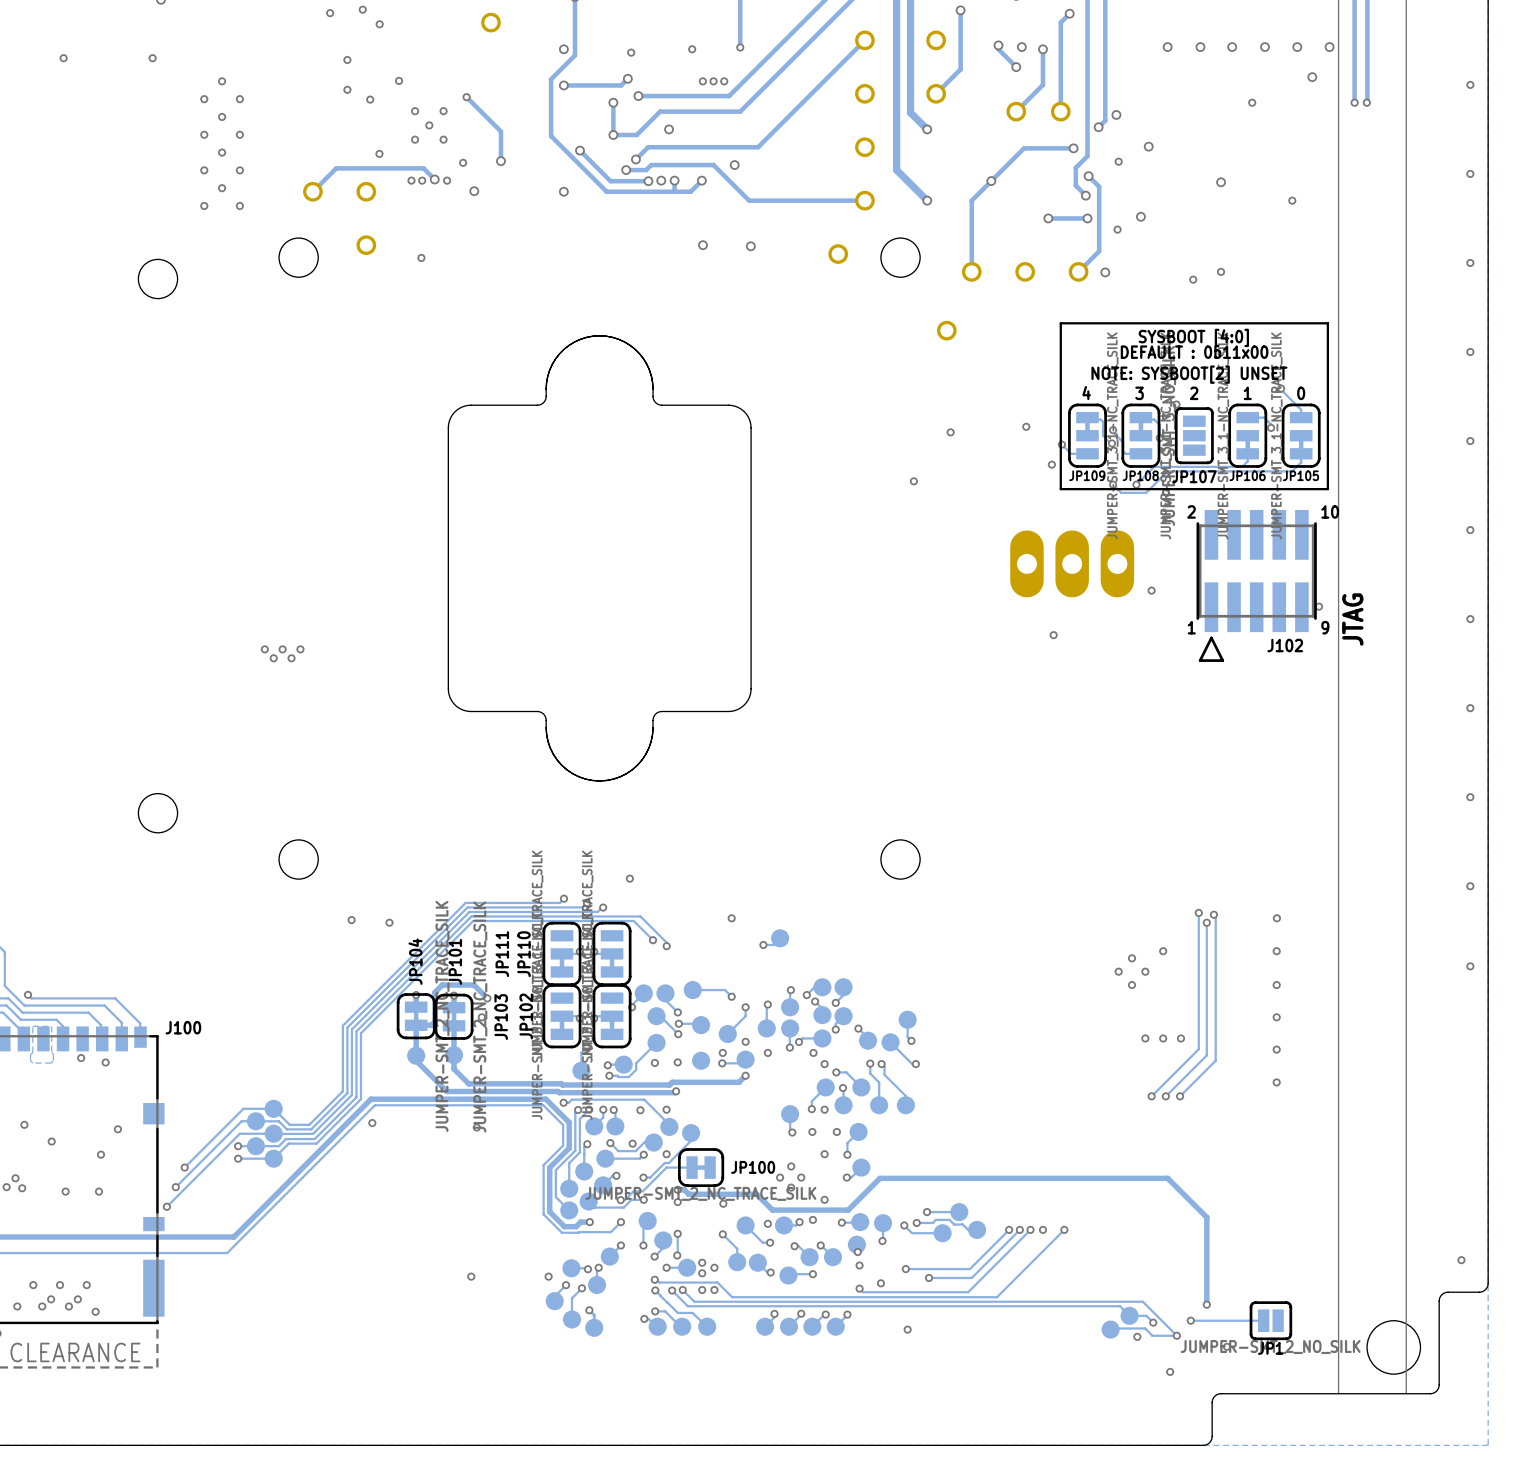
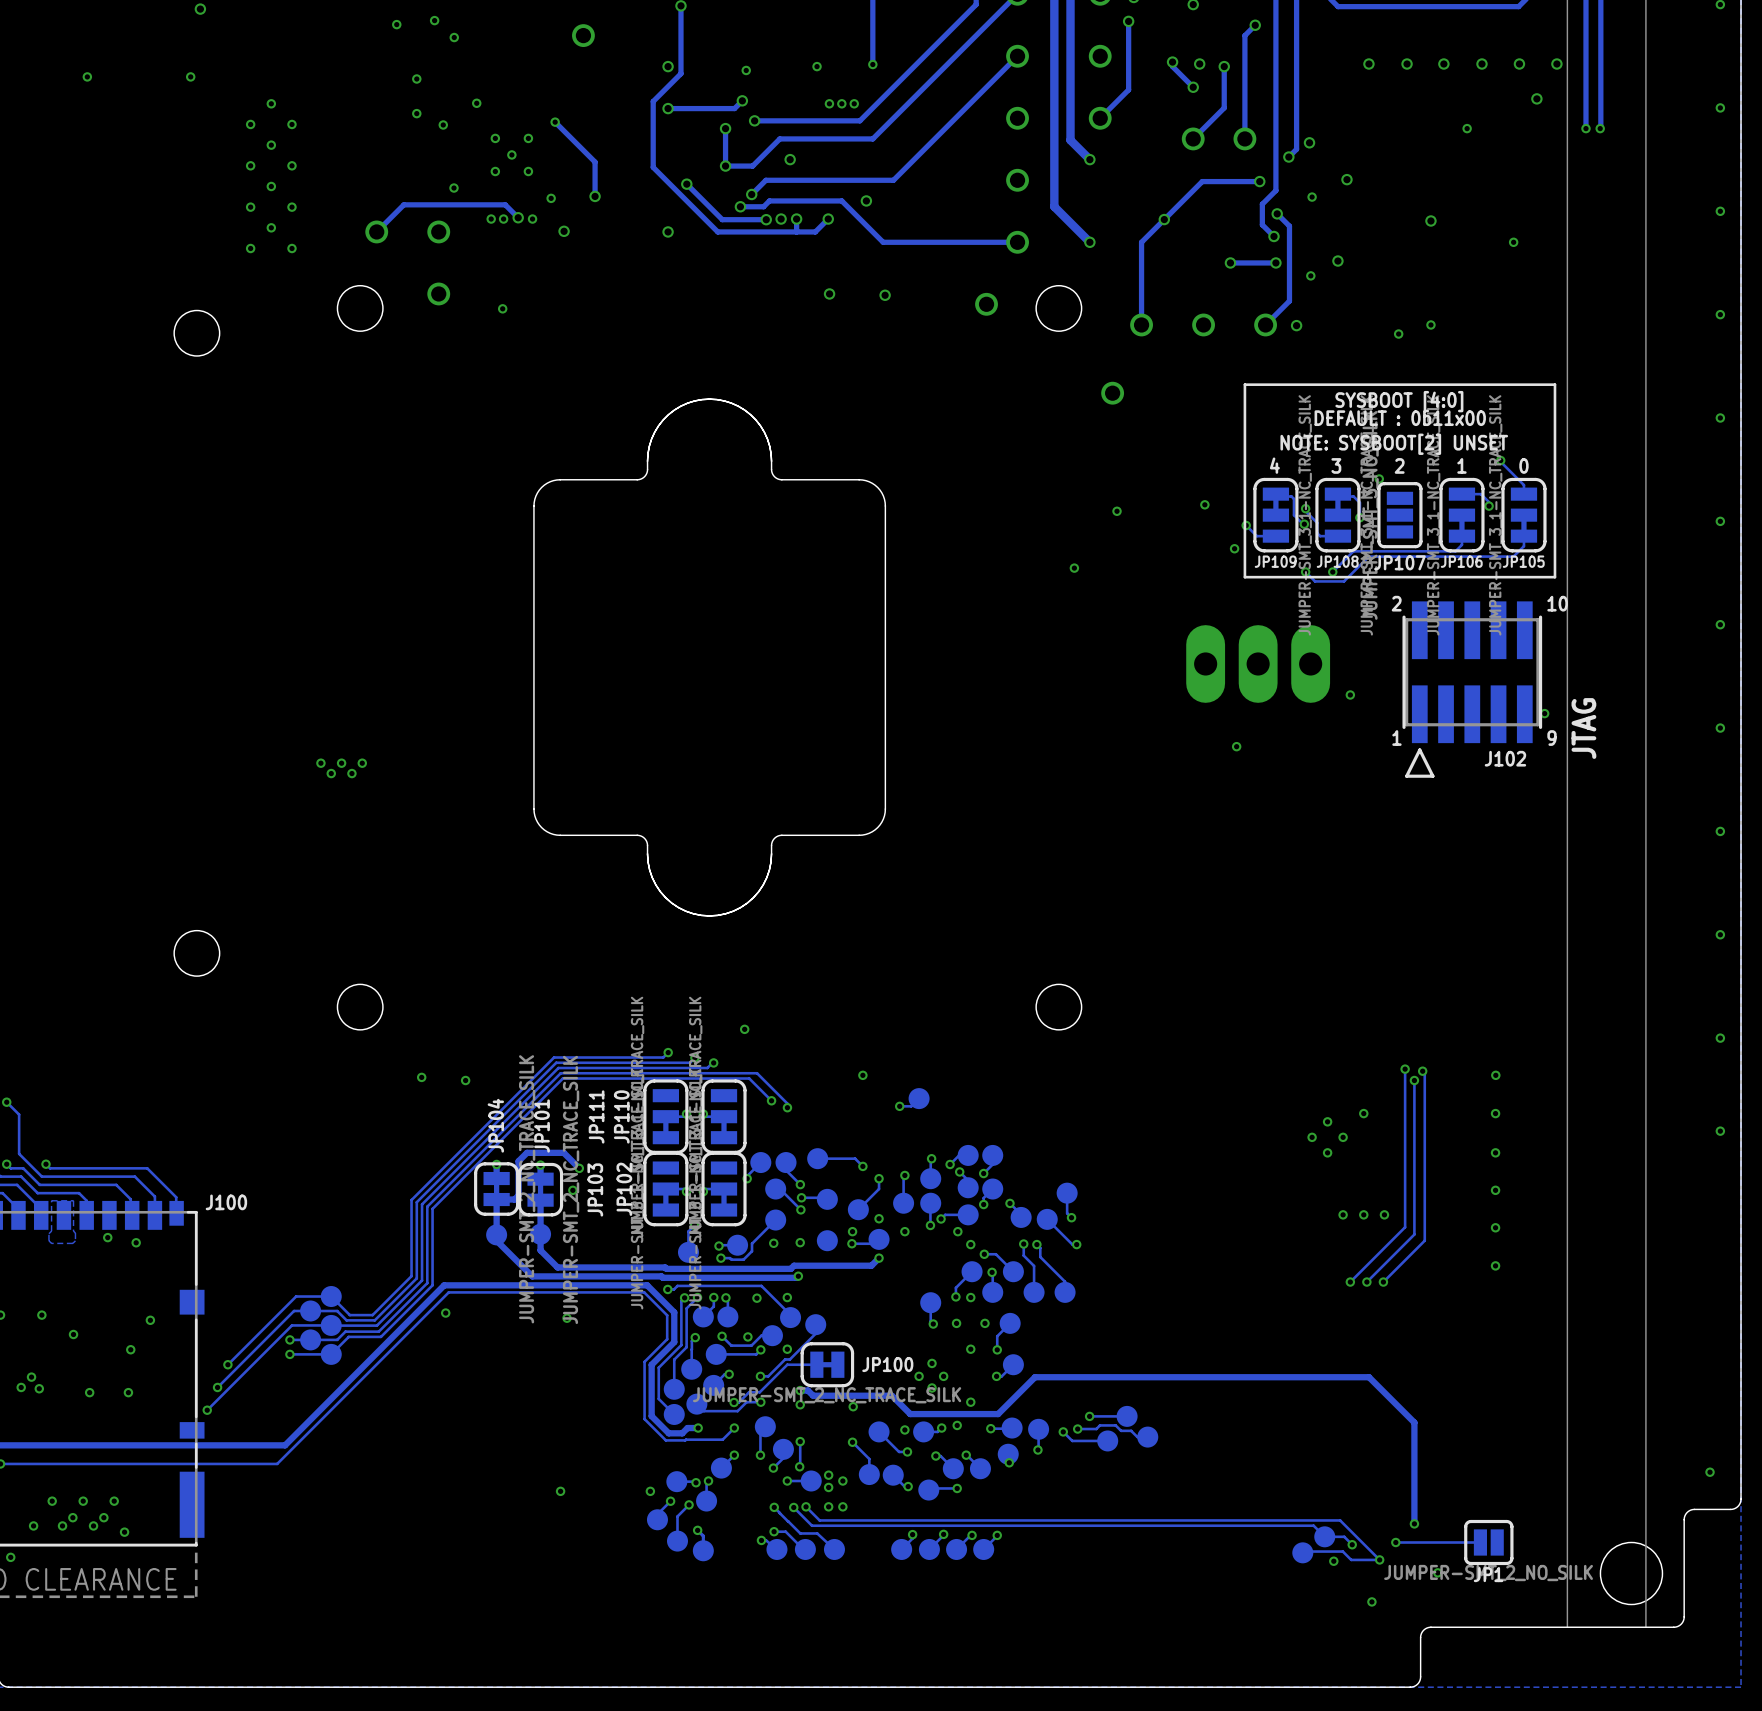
track: (1009, 1229) (969, 1269) (904, 1269) -> none
via: (1009, 1229) -> none
track: (1019, 1229) (971, 1277) (929, 1277) -> none
via: (1019, 1229) -> none
track: (1030, 1229) (968, 1292) (863, 1292) (859, 1288) -> none
via: (1030, 1229) -> none
via: (1042, 1229) -> none
track: (1064, 1229) (997, 1297) (732, 1297) (717, 1282) (659, 1282) (654, 1279) -> none
via: (1064, 1229) -> none
via: (859, 1265) -> none
via: (905, 1269) -> none
via: (929, 1277) -> none
via: (654, 1279) -> none
via: (880, 1283) -> none
via: (859, 1288) -> none
via: (907, 1329) -> none

